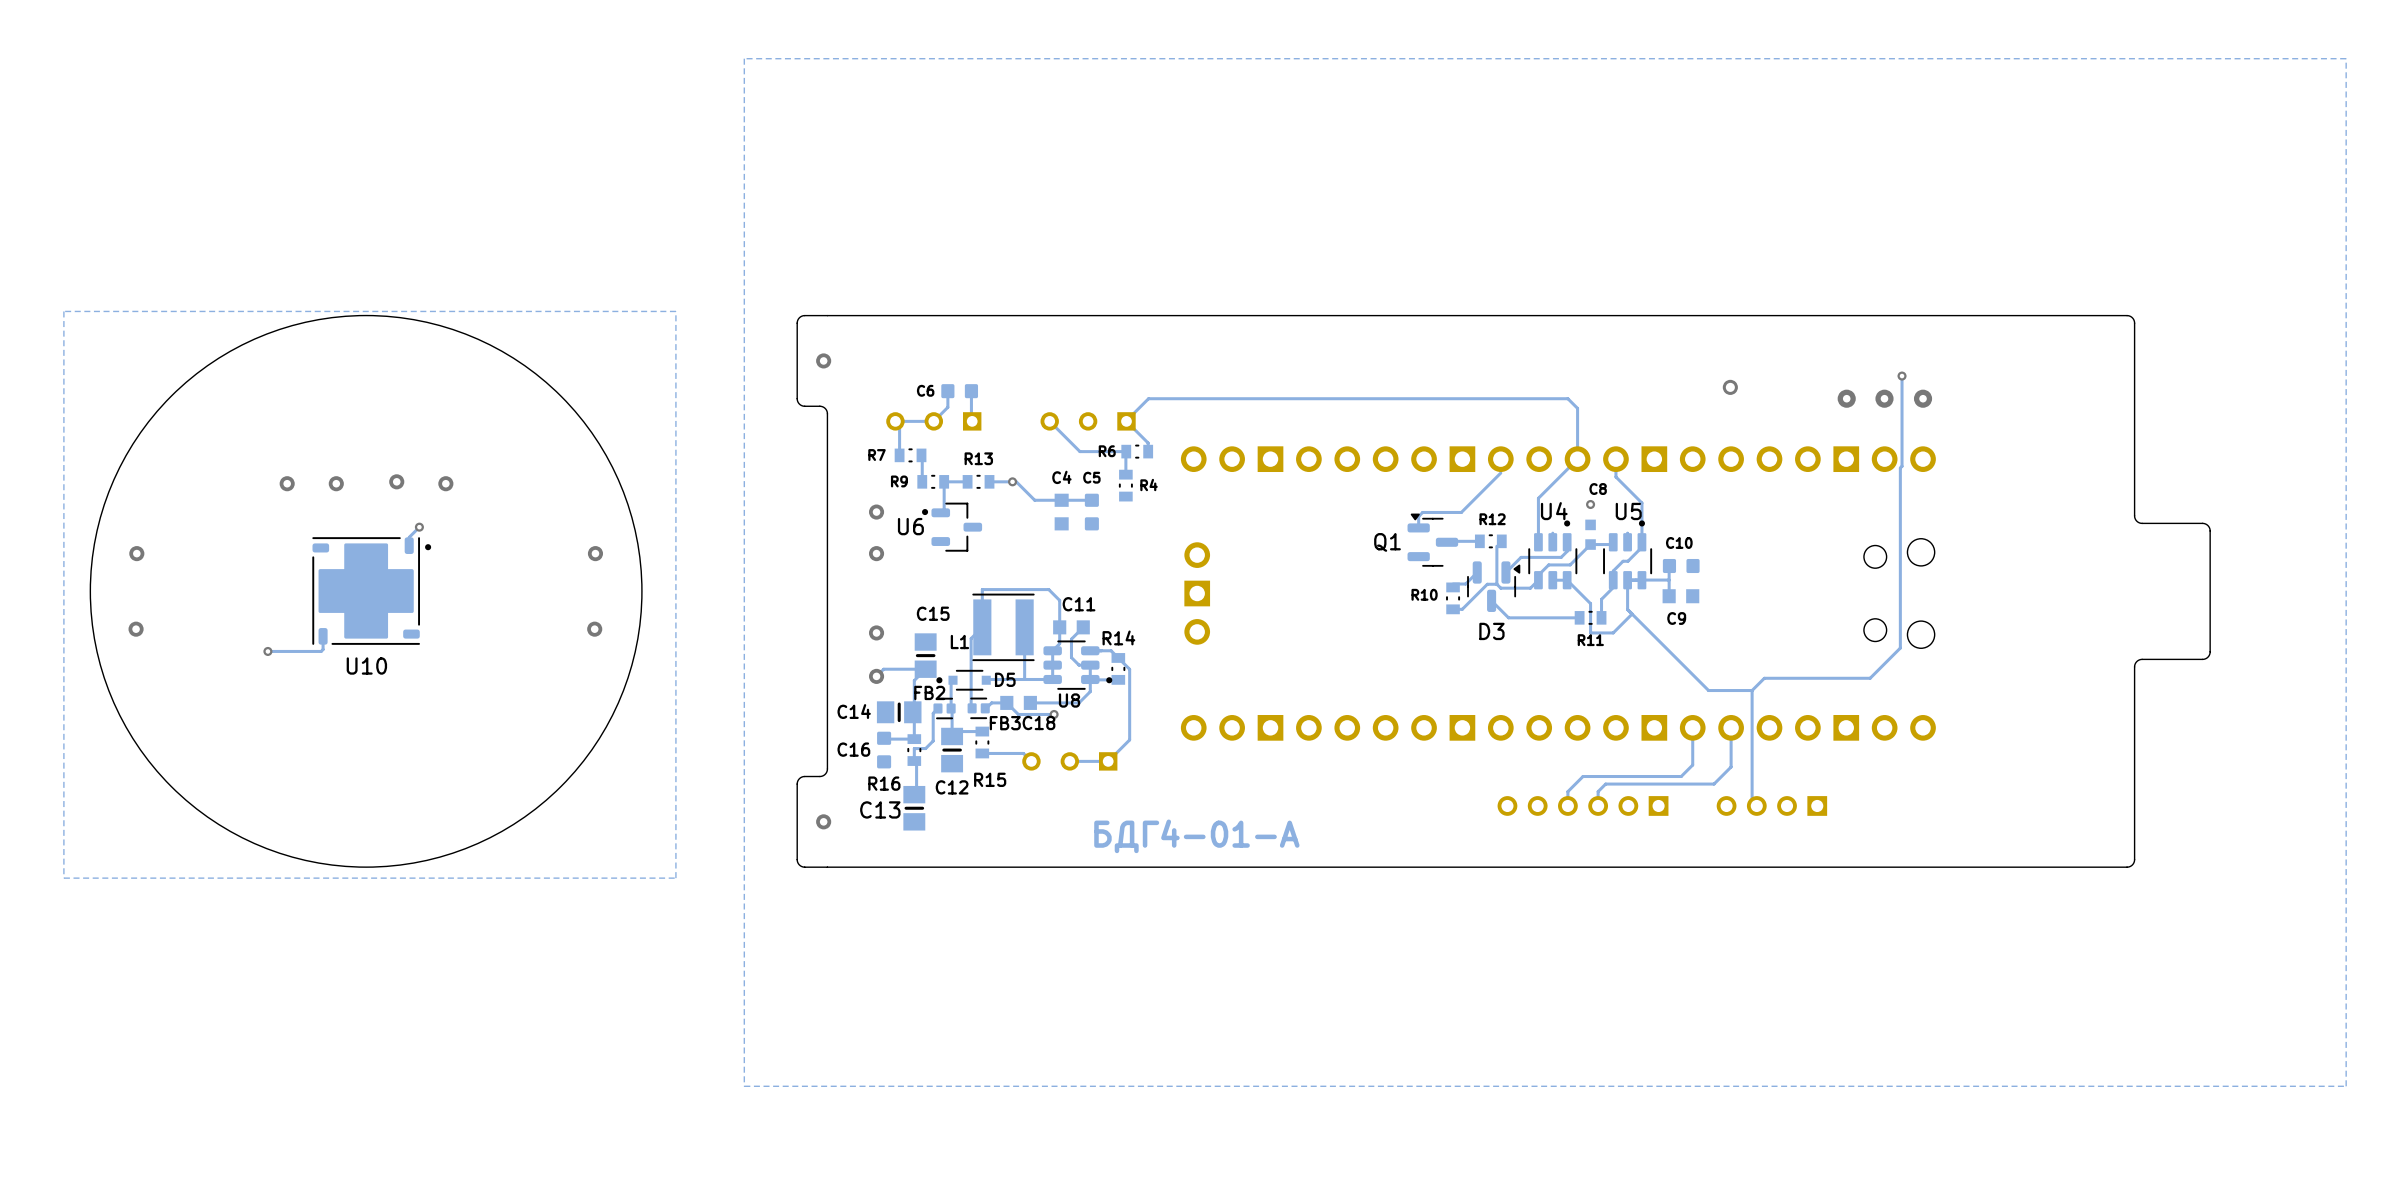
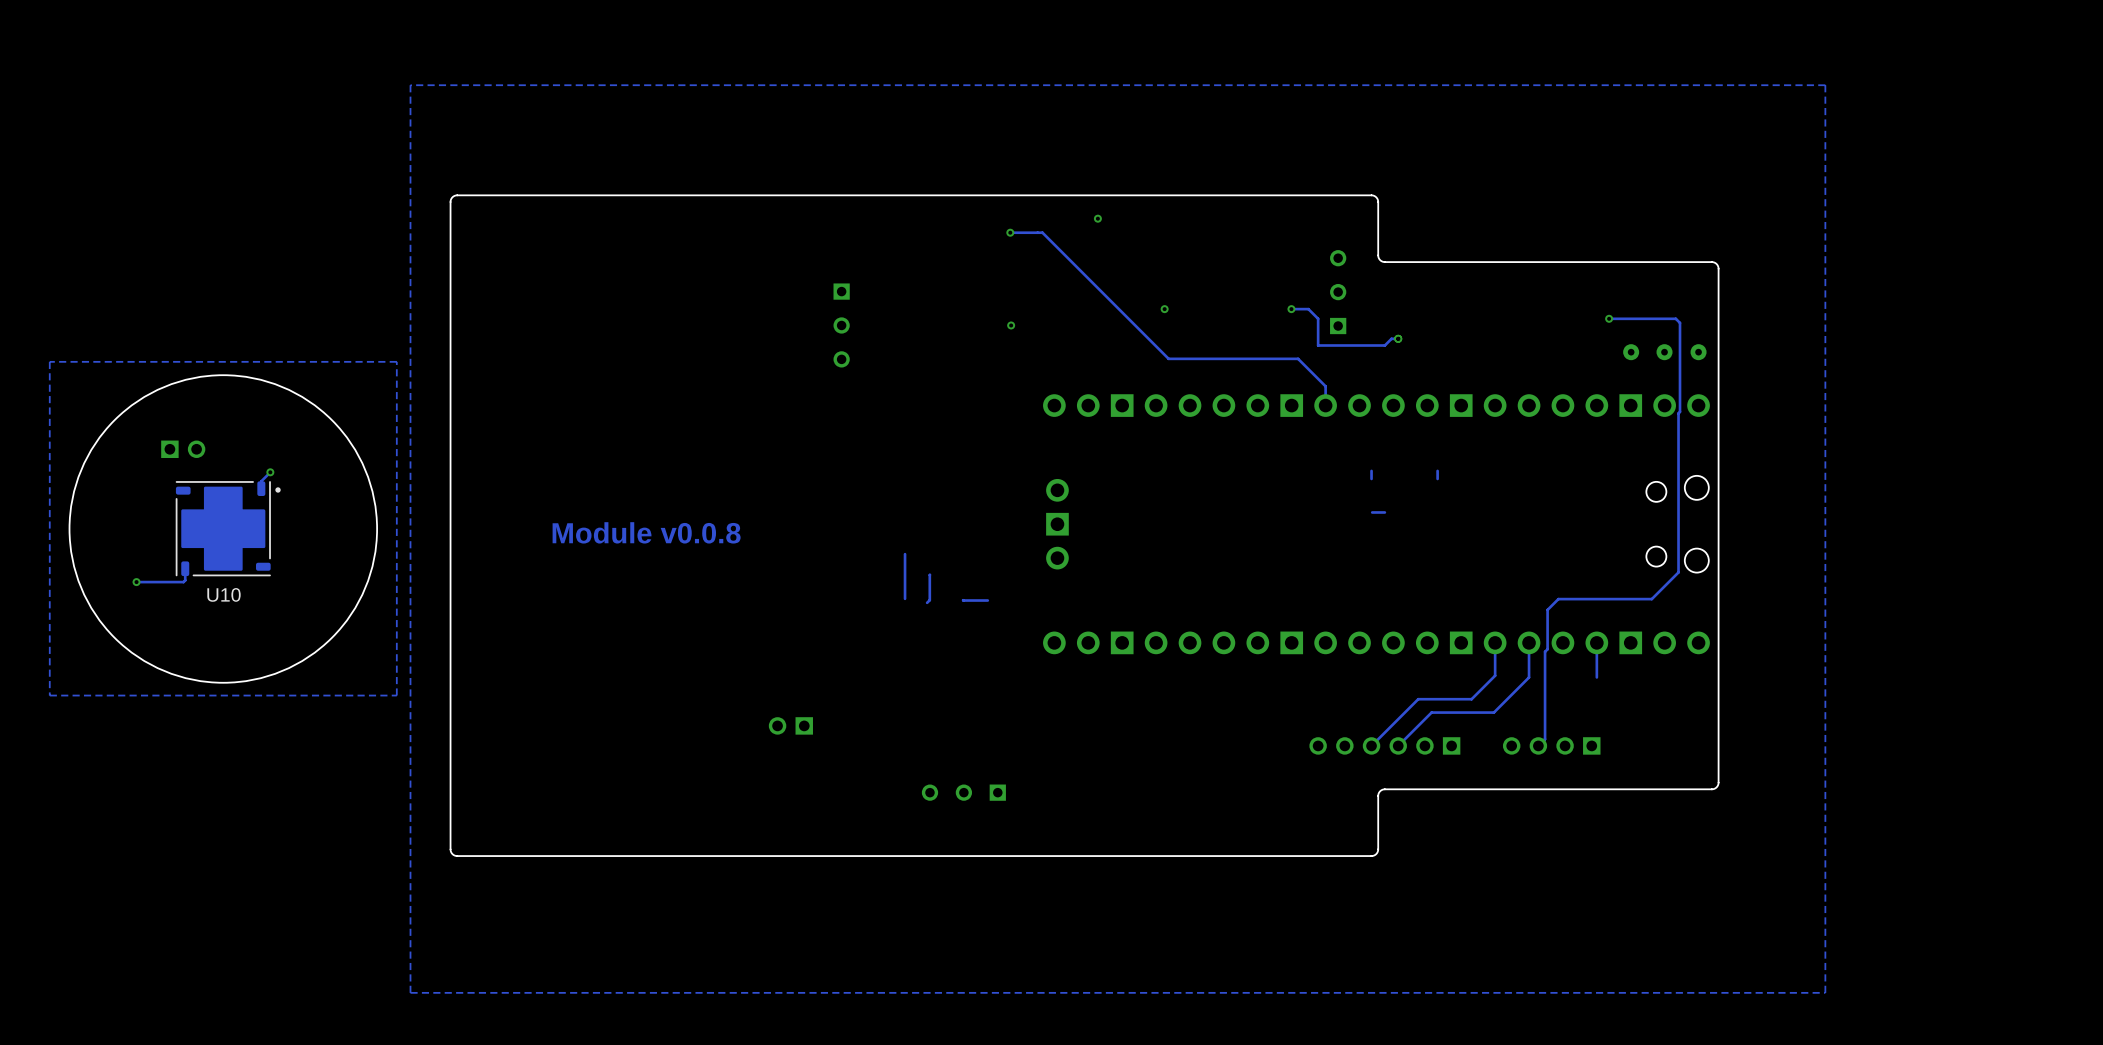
zone outline: (2346, 58) (744, 58) (744, 1086) (2346, 1086) (2346, 58) -> (1825, 85) (410, 85) (410, 992) (1825, 992) (1825, 85)
via: none -> (1097, 218)
track: none -> (1010, 232) (1042, 232) (1168, 358) (1298, 358) (1325, 386) (1325, 406)
via: none -> (1010, 232)
zone outline: (675, 311) (63, 311) (63, 878) (675, 878) (675, 311) -> none
round board edge: [89, 315, 643, 868] -> none
board edge: (2127, 315) (801, 316) (797, 323) (797, 400) (802, 406) (822, 406) (827, 413) (827, 768) (822, 775) (802, 776) (797, 782) (797, 862) (804, 867) (2129, 866) (2134, 859) (2134, 664) (2141, 659) (2202, 659) (2209, 655) (2210, 530) (2208, 526) (2203, 523) (2141, 523) (2135, 518) (2134, 323) (2132, 317) (2127, 315) -> (1371, 195) (1376, 197) (1378, 201) (1378, 256) (1383, 261) (1711, 262) (1717, 265) (1718, 782) (1715, 787) (1384, 789) (1378, 795) (1378, 850) (1376, 854) (1371, 856) (457, 856) (451, 853) (450, 202) (453, 196) (1371, 195)
part: none -> (1338, 292)
via: none -> (1164, 309)
track: none -> (1291, 309) (1308, 309) (1318, 318) (1318, 345) (1384, 345) (1391, 338) (1398, 338)
via: none -> (1291, 309)
via: (823, 360) -> none
track: none -> (1609, 318) (1675, 318) (1680, 322) (1680, 332)
via: none -> (1011, 325)
via position: (1902, 376) -> (1609, 318)
via: none -> (1398, 338)
via: (1730, 387) -> none
track: (947, 391) (947, 407) (933, 421) (895, 421) (899, 425) (899, 455) -> none
C6: (959, 391) -> none
track: (971, 391) (972, 421) -> none
zone outline: none -> (396, 361) (49, 361) (49, 695) (396, 695) (396, 361)
part rotation: 0° (933, 421) -> 90° counterclockwise (841, 325)
track: (1049, 421) (1079, 451) (1126, 451) (1125, 474) -> none
part: (1088, 421) -> none
round board edge: none -> [69, 374, 378, 684]
R6: (1137, 451) -> none
track: (1148, 451) (1148, 443) (1126, 420) (1148, 398) (1567, 398) (1577, 408) (1577, 459) (1538, 498) (1538, 542) -> none
R7: (910, 455) -> none
track: (921, 455) (922, 481) -> none
track: (1615, 459) (1615, 476) (1641, 502) (1641, 547) (1627, 561) (1623, 561) (1613, 571) (1613, 587) (1601, 599) (1601, 617) -> none
track: (1500, 473) (1461, 512) (1422, 512) (1418, 516) (1418, 527) -> none
via: (396, 481) -> none
R9: (933, 481) -> none
track: (967, 481) (944, 481) (944, 509) (940, 512) -> none
R13: (978, 481) -> none
track: (989, 481) (1016, 481) (1034, 500) (1091, 500) -> none
via: (1012, 481) -> none
via: (287, 483) -> none
via: (336, 483) -> none
via: (445, 483) -> none
R4: (1125, 485) -> none
via: (1590, 504) -> none
part: none -> (183, 449)
via: (876, 512) -> none
C4: (1061, 512) -> none
C5: (1091, 512) -> none
track: (419, 527) (409, 537) (409, 545) -> (270, 472) (261, 481) (261, 488)
via: (419, 527) -> none
U6: (952, 527) -> none
via: none -> (270, 472)
C8: (1590, 534) -> none
Q1: (1432, 540) -> none
track: (1479, 541) (1447, 542) -> none
R12: (1490, 541) -> none
track: (1567, 542) (1567, 551) (1561, 557) (1521, 557) (1505, 572) -> none
track: (1613, 542) (1610, 544) (1590, 544) (1570, 564) (1548, 564) (1538, 575) -> none
track: (1496, 546) (1496, 584) -> none
via: (136, 553) -> none
via: (595, 553) -> none
via: (876, 553) -> none
U4: (1552, 554) -> none
U5: (1627, 554) -> none
track: (1669, 566) (1669, 596) -> none
C10: (1681, 566) -> none
track: (1477, 572) (1465, 584) (1453, 584) -> none
track: (1538, 580) (1530, 588) (1500, 588) (1496, 584) -> none
track: (1567, 580) (1590, 603) (1590, 632) (1613, 632) (1632, 614) -> none
track: (1641, 580) (1627, 580) (1627, 609) (1708, 690) (1752, 690) -> none
track: (1669, 580) (1628, 580) -> none
track: (1496, 584) (1487, 584) (1462, 609) (1453, 609) -> none
D3: (1493, 586) -> none
U10 position: (371, 591) -> (228, 528)
C9: (1680, 596) -> none
R10: (1453, 598) -> none
track: (1491, 600) (1508, 617) (1579, 617) -> none
text: none -> Module v0.0.8 (646, 532)
R11: (1590, 617) -> none
L1: (1003, 627) -> none
C11: (1071, 627) -> none
track: (1083, 627) (1071, 639) (1071, 657) (1079, 665) (1090, 665) (1090, 676) -> none
via: (136, 629) -> none
via: (594, 629) -> none
via: (876, 632) -> none
track: (323, 636) (323, 649) (321, 651) (267, 651) -> (185, 568) (183, 582) (136, 582)
track: (1048, 650) (1052, 650) (1059, 643) (1059, 600) (1048, 589) (982, 589) (982, 627) (971, 638) (970, 710) -> none
track: (1090, 650) (1111, 650) (1129, 669) (1129, 739) (1108, 761) (1069, 761) -> none
via: (267, 651) -> none
C15: (925, 655) -> none
via: none -> (136, 582)
U8: (1077, 665) -> none
R14: (1118, 668) -> none
track: (876, 676) (883, 669) (925, 669) (914, 680) (914, 739) (884, 738) -> none
via: (876, 676) -> none
track: (1060, 679) (986, 680) -> none
track: (1097, 679) (1090, 679) (1090, 691) (1079, 702) (1030, 702) -> none
track: (953, 680) (951, 682) (952, 736) (957, 731) (982, 731) -> none
D5: (963, 680) -> none
C18: (1018, 702) -> none
track: (937, 708) (933, 713) (933, 740) (925, 748) (914, 748) (914, 761) (916, 763) (916, 795) -> none
FB2: (944, 708) -> none
FB3: (978, 708) -> none
track: (984, 710) (991, 702) (1006, 702) (1018, 714) (1054, 714) -> none
C14: (899, 712) -> none
via: (1054, 714) -> none
track: none -> (1596, 642) (1596, 677)
track: (1752, 735) (1752, 801) (1756, 805) -> (1547, 649) (1545, 651) (1545, 739) (1538, 745)
R15: (982, 742) -> none
C16: (884, 750) -> none
R16: (914, 750) -> none
C12: (952, 750) -> none
track: (982, 753) (1023, 753) (1031, 761) -> none
part position: (1069, 761) -> (963, 792)
track: (1681, 776) (1583, 776) (1567, 791) (1567, 805) -> (1484, 685) (1471, 699) (1418, 699) (1371, 745)
track: (1714, 784) (1605, 784) (1598, 791) (1598, 805) -> (1513, 692) (1493, 712) (1431, 712) (1398, 745)
part position: (1583, 805) -> (1384, 745)
part position: (1771, 805) -> (1551, 745)
C13: (914, 808) -> none
via: (823, 821) -> none
part: none -> (790, 725)
text: БДГ4-01-А (1196, 836) -> none

